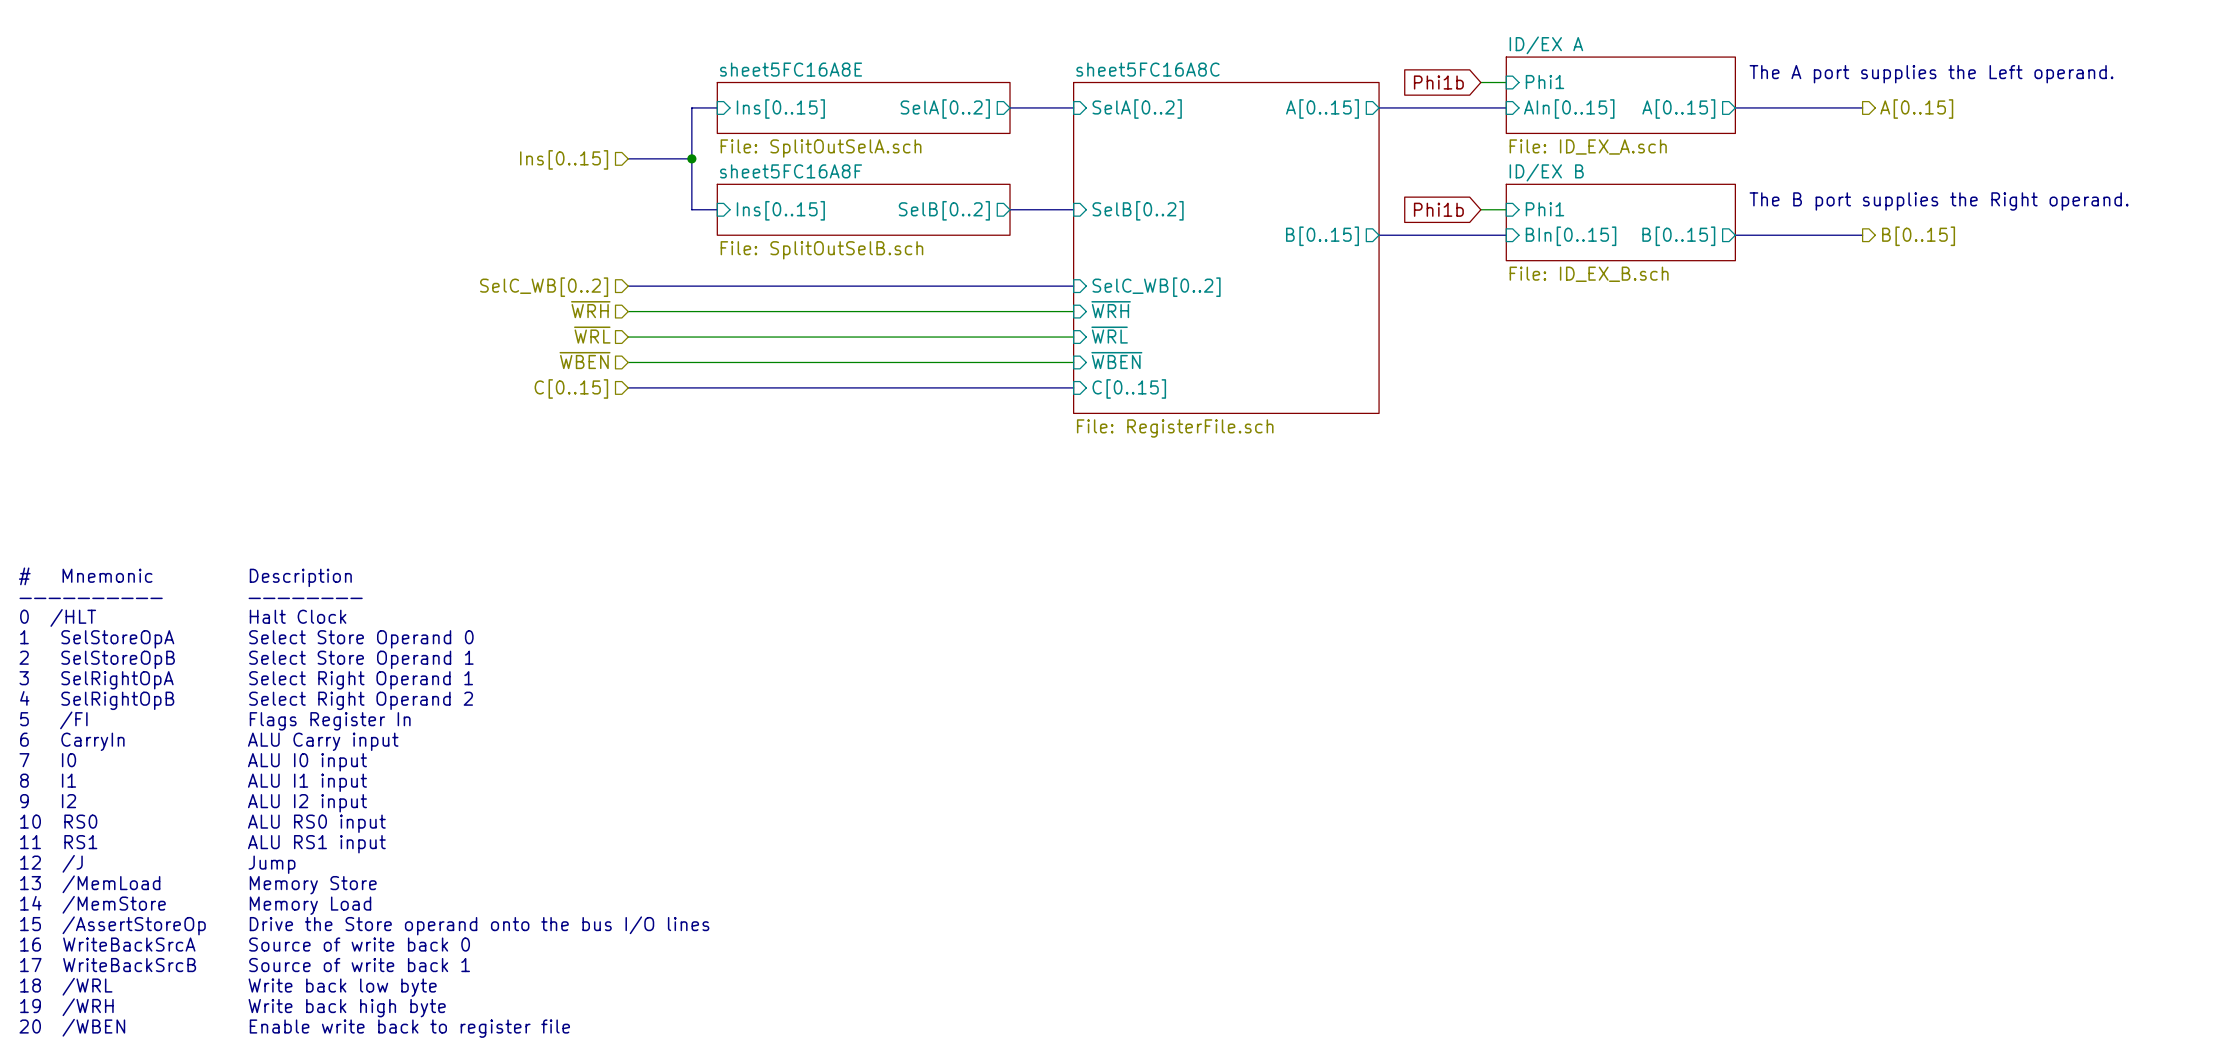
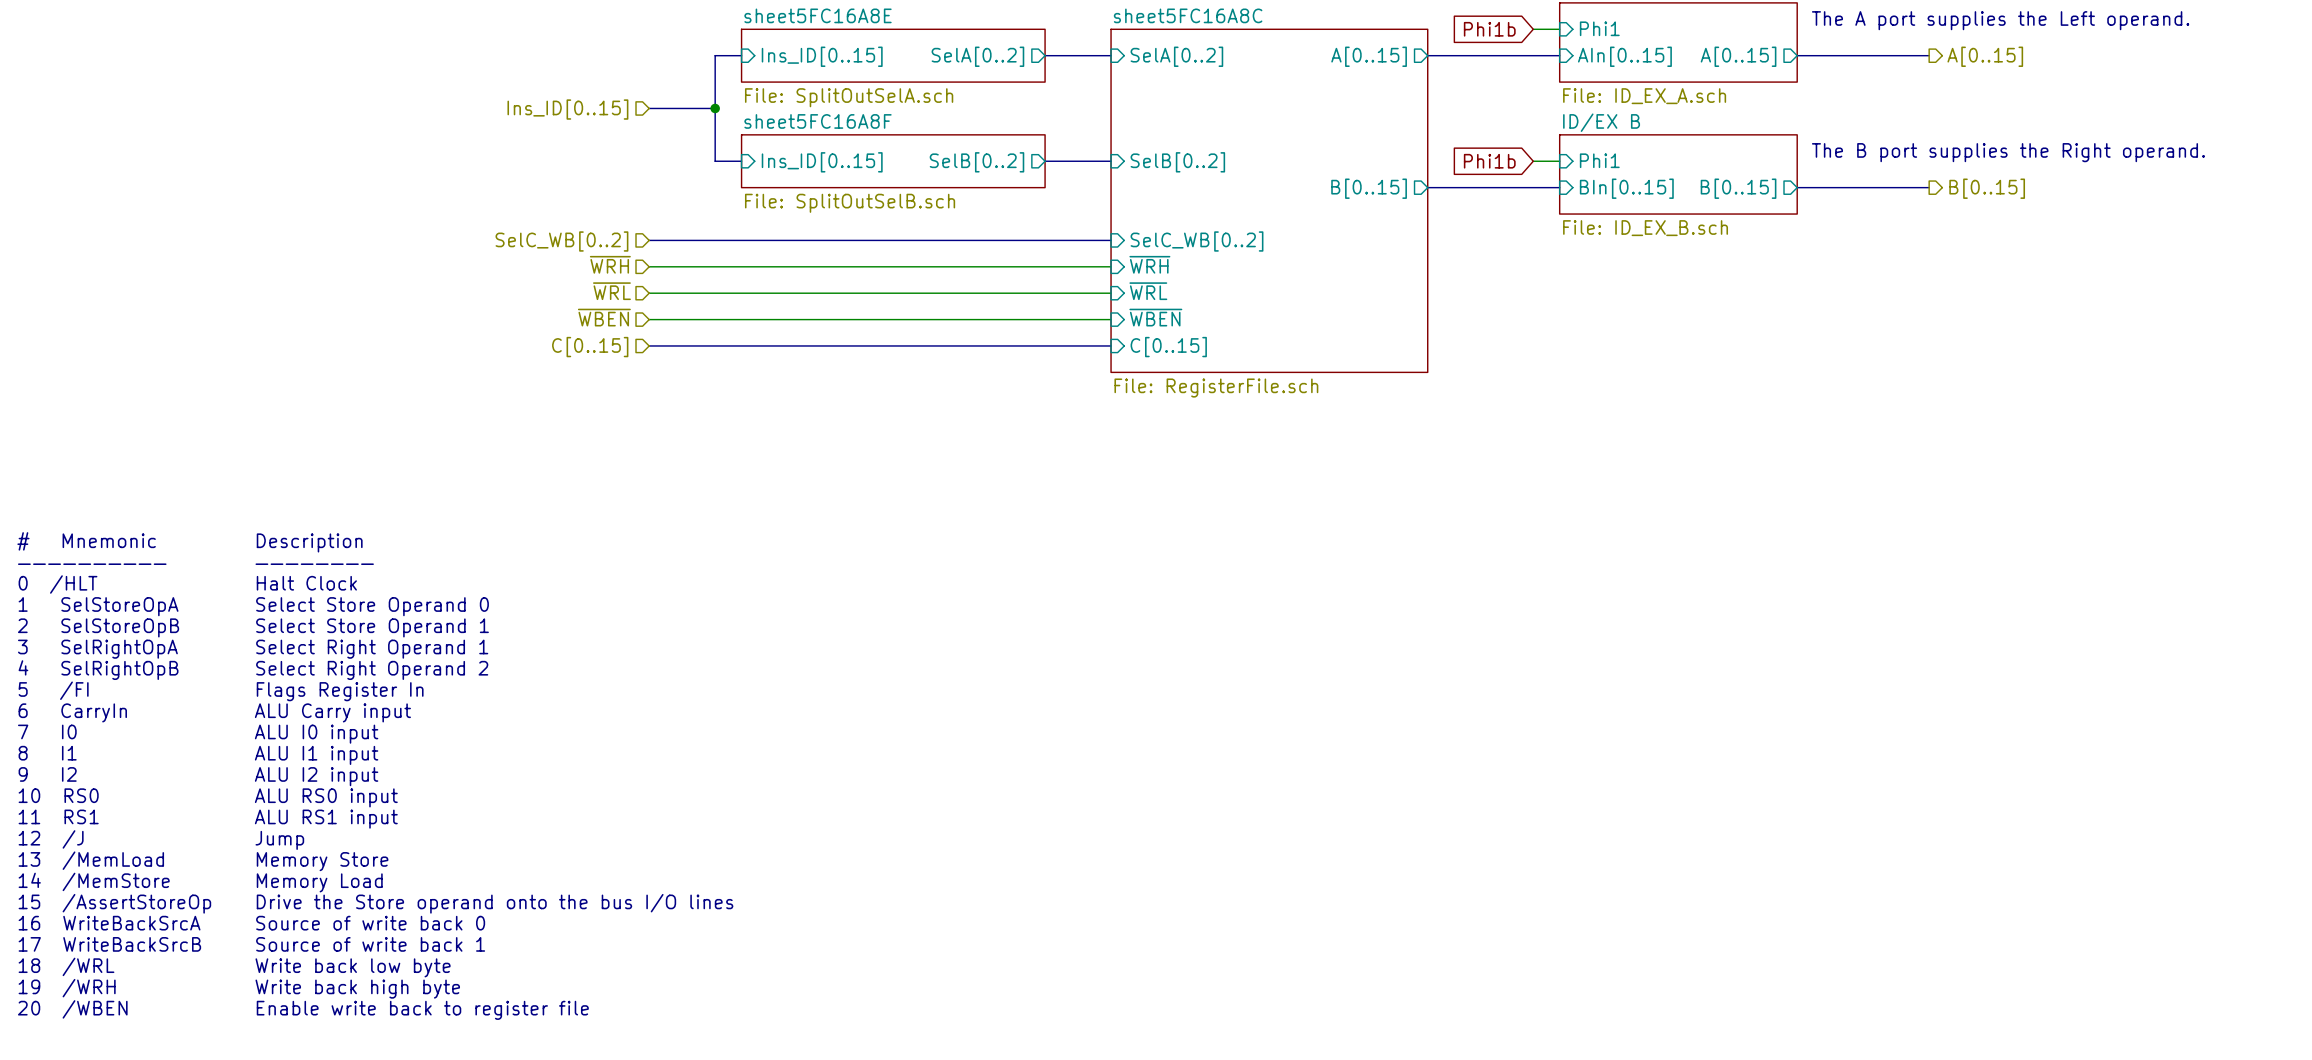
sheet pin: Ins[0..15] (780, 109) -> Ins_ID[0..15] (822, 56)
hierarchical label: Ins[0..15] (564, 159) -> Ins_ID[0..15] (567, 109)
sheet pin: Ins[0..15] (780, 210) -> Ins_ID[0..15] (822, 162)

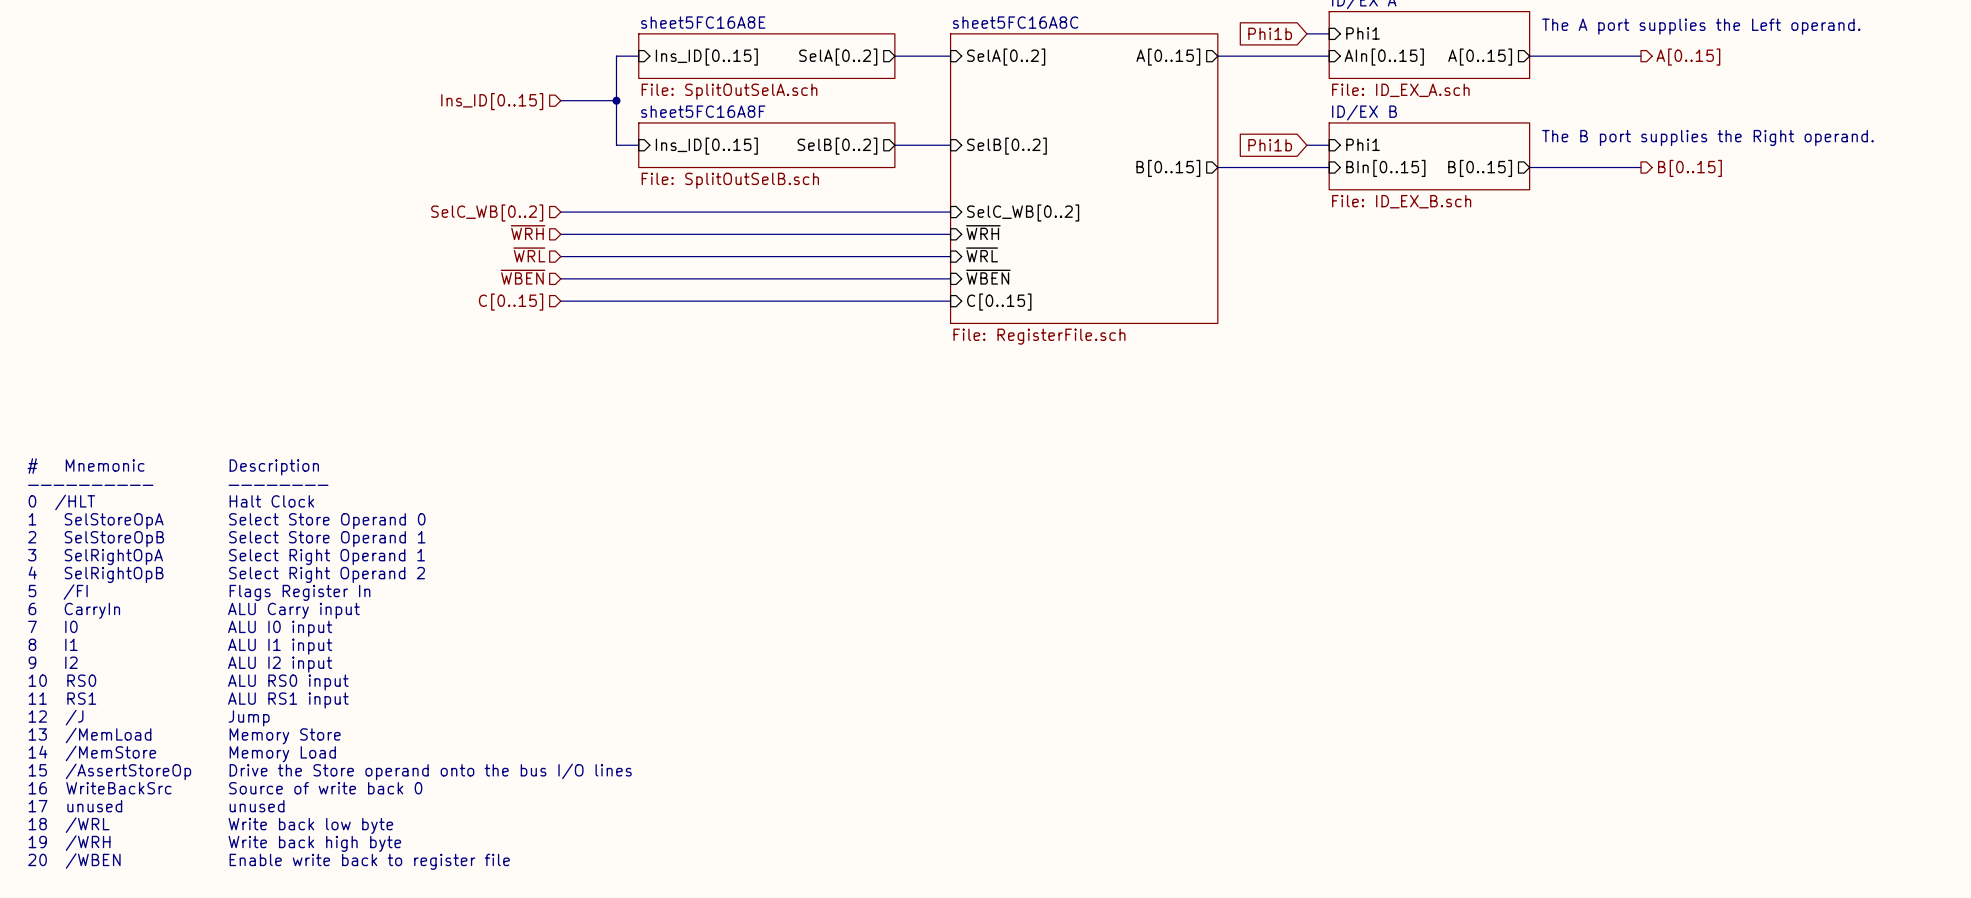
text: 16 WriteBackSrcA (109, 923) -> 16 WriteBackSrc (100, 788)
text: 17 WriteBackSrcB (109, 944) -> 17 unused (75, 806)
text: Source of write back 1 (370, 944) -> unused (257, 806)

